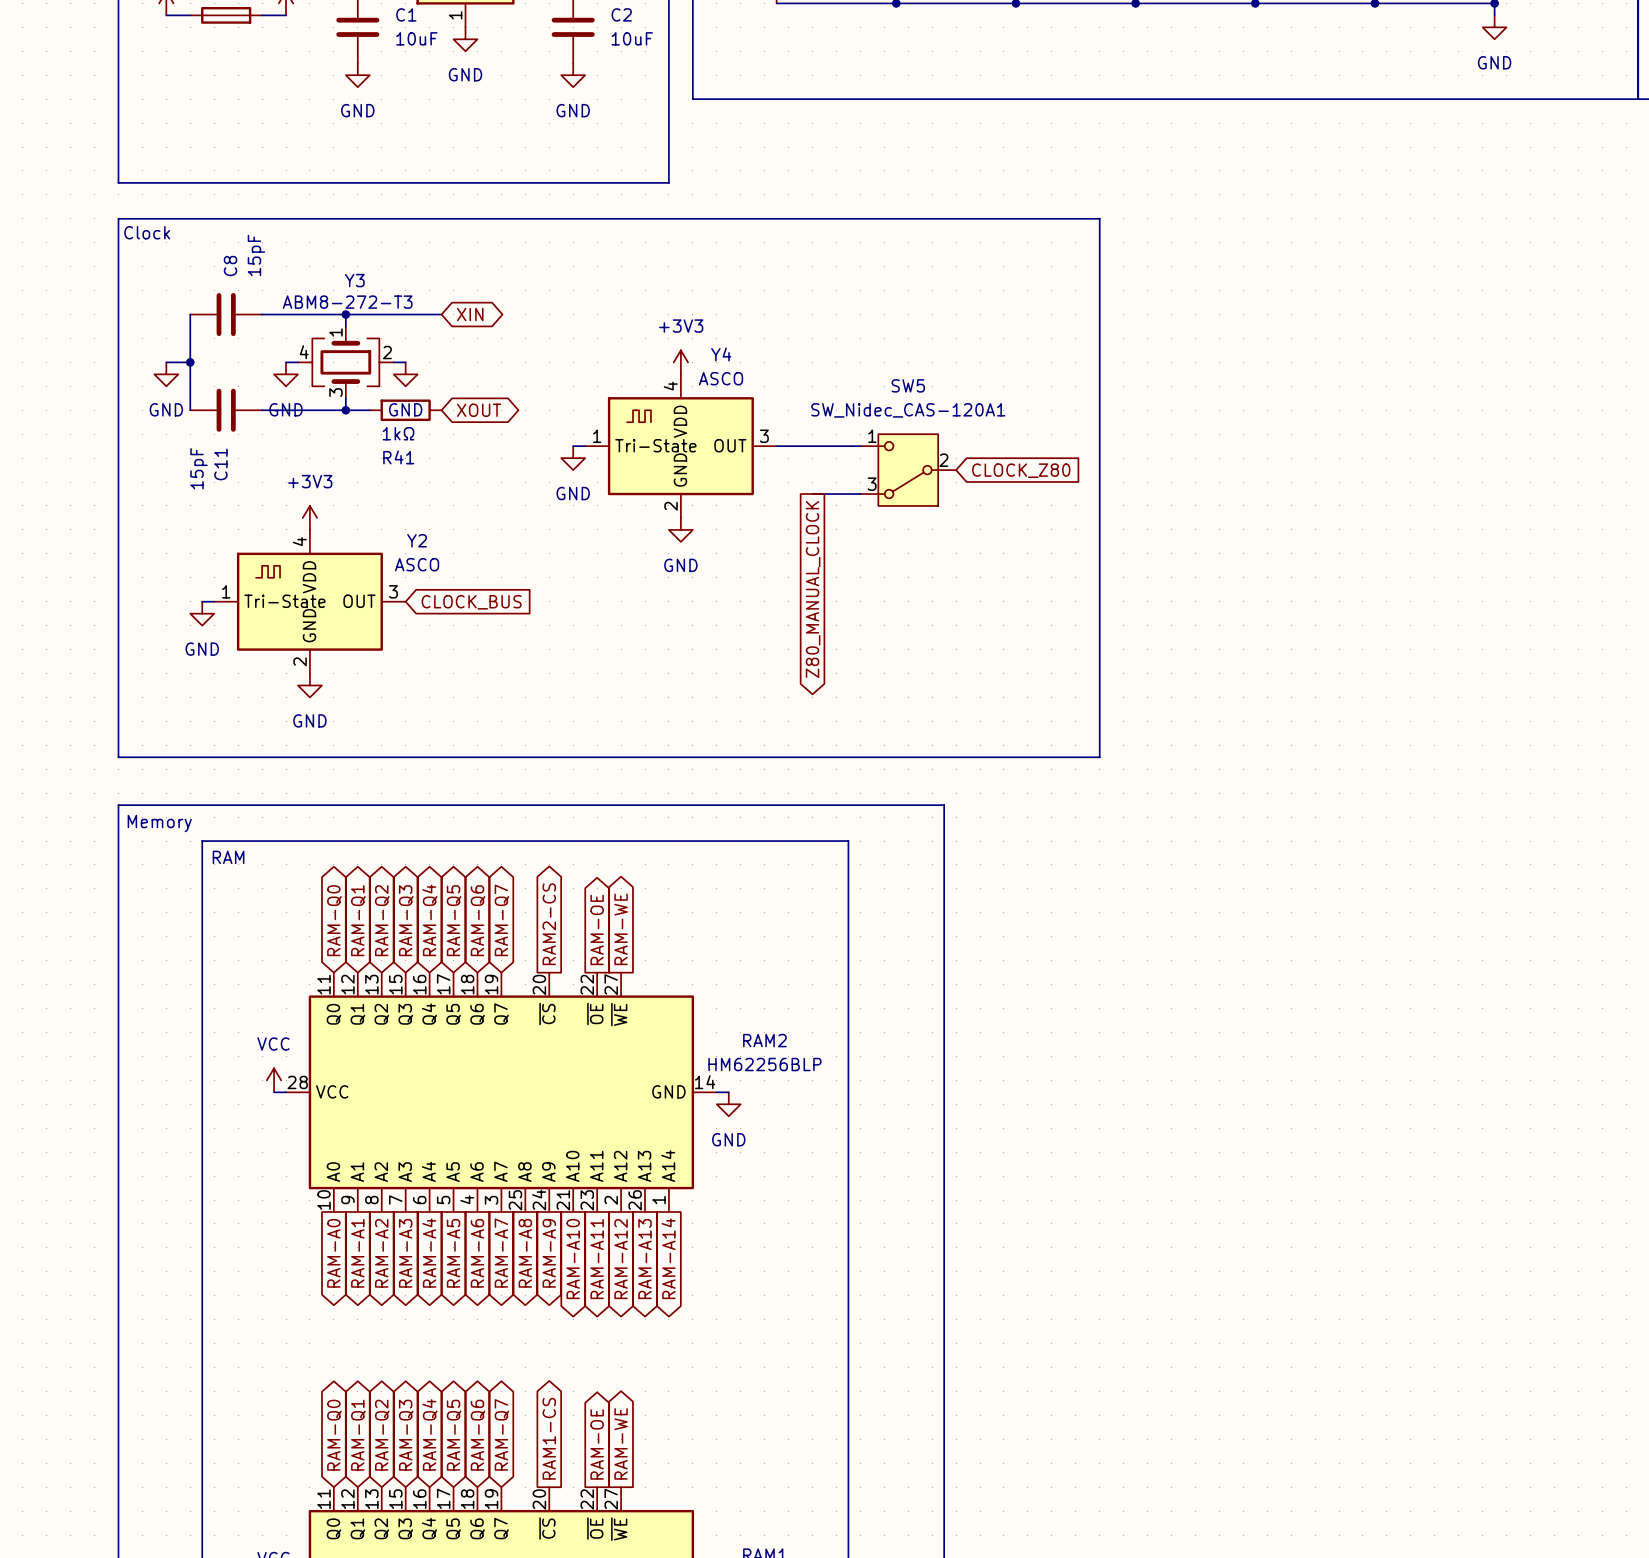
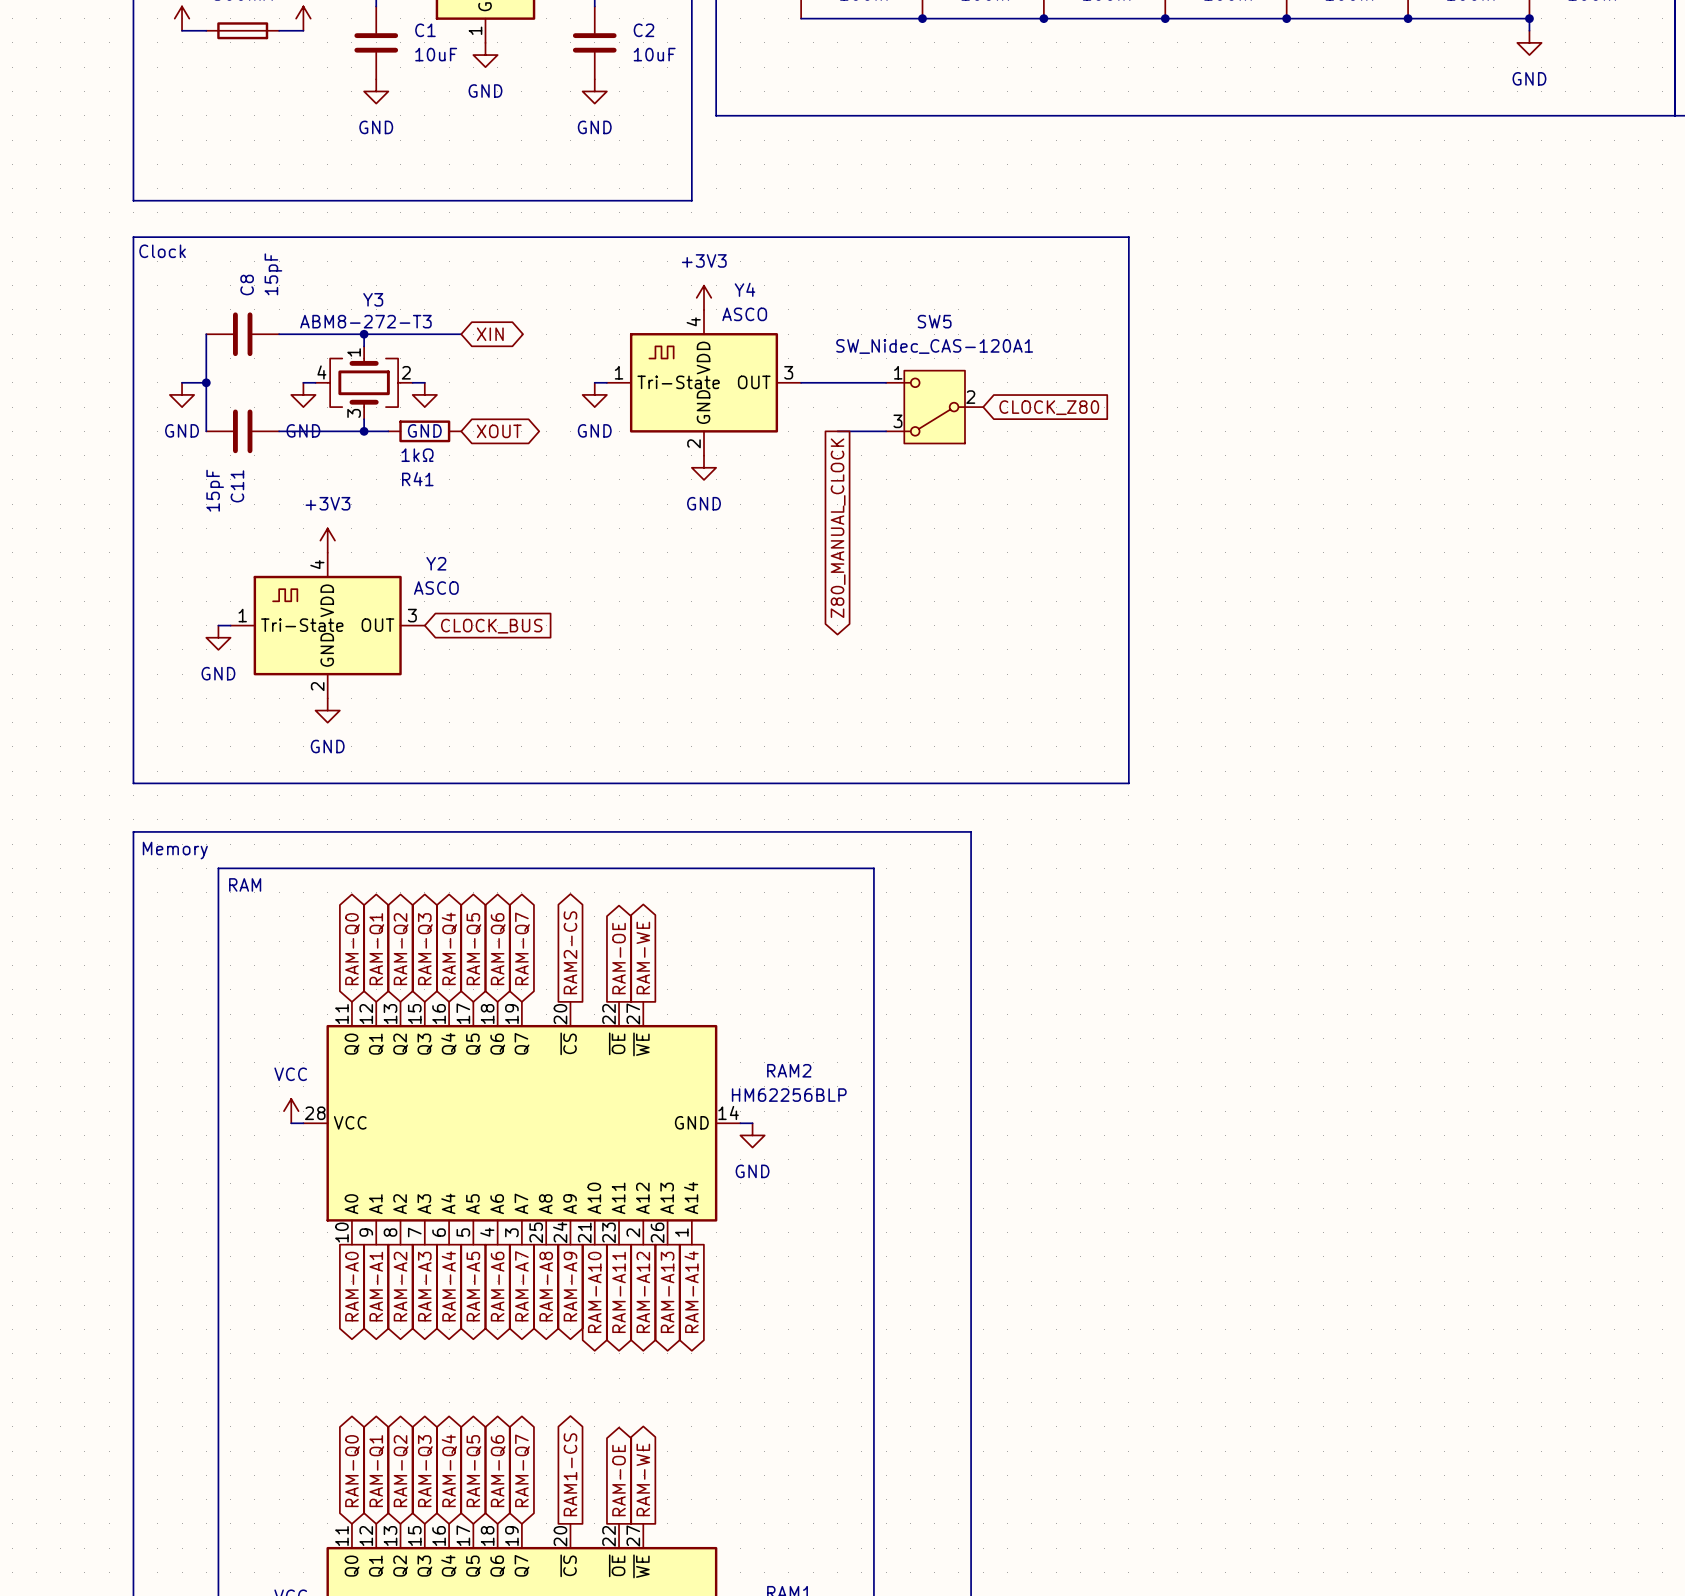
power symbol position: +3V3 (680, 362) -> +3V3 (704, 297)
power symbol: none -> GND (594, 394)
wire: (573, 446) (585, 446) -> (594, 382) (606, 382)
Y4 position: (680, 446) -> (704, 382)
power symbol: none -> GND (704, 467)
wire: (776, 446) (860, 446) -> (801, 382) (886, 382)
power symbol: GND (573, 458) -> none
SW5 position: (908, 470) -> (934, 407)
global label position: CLOCK_Z80 (1021, 470) -> CLOCK_Z80 (1049, 407)
wire: (812, 494) (860, 494) -> (837, 431) (886, 431)
power symbol: GND (680, 529) -> none
global label position: Z80_MANUAL_CLOCK (813, 589) -> Z80_MANUAL_CLOCK (838, 528)

